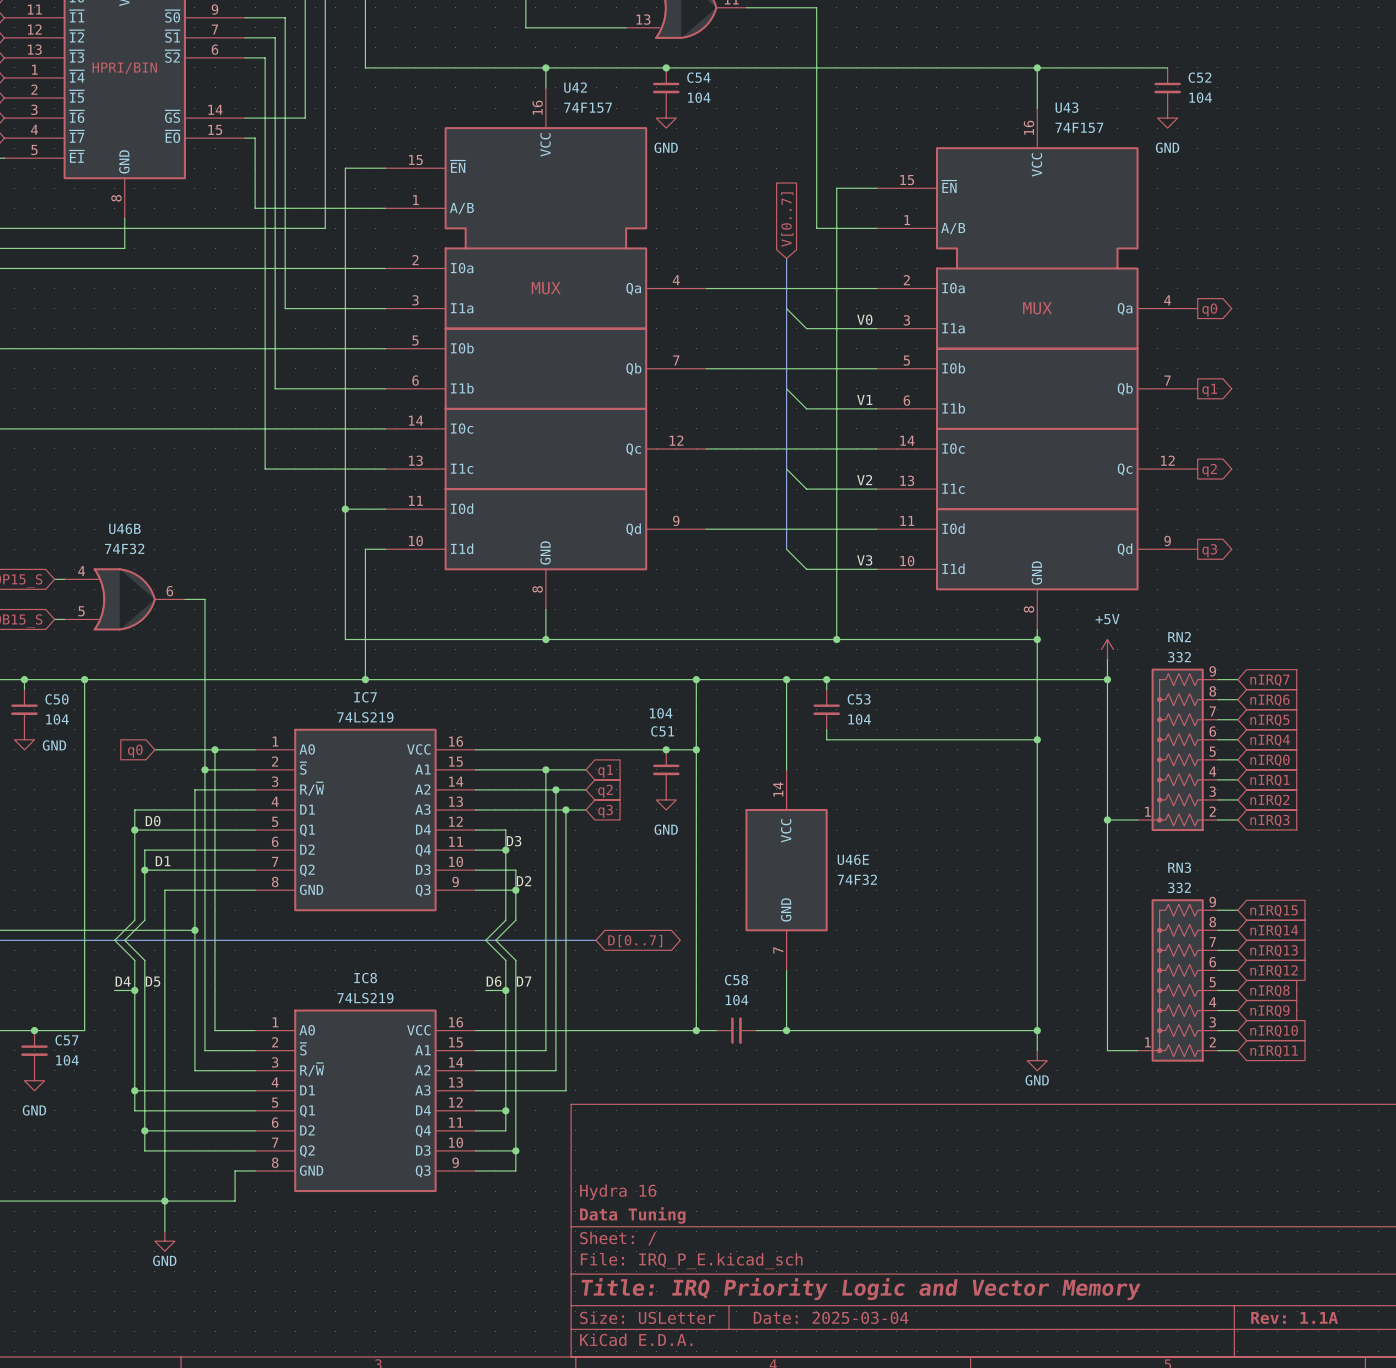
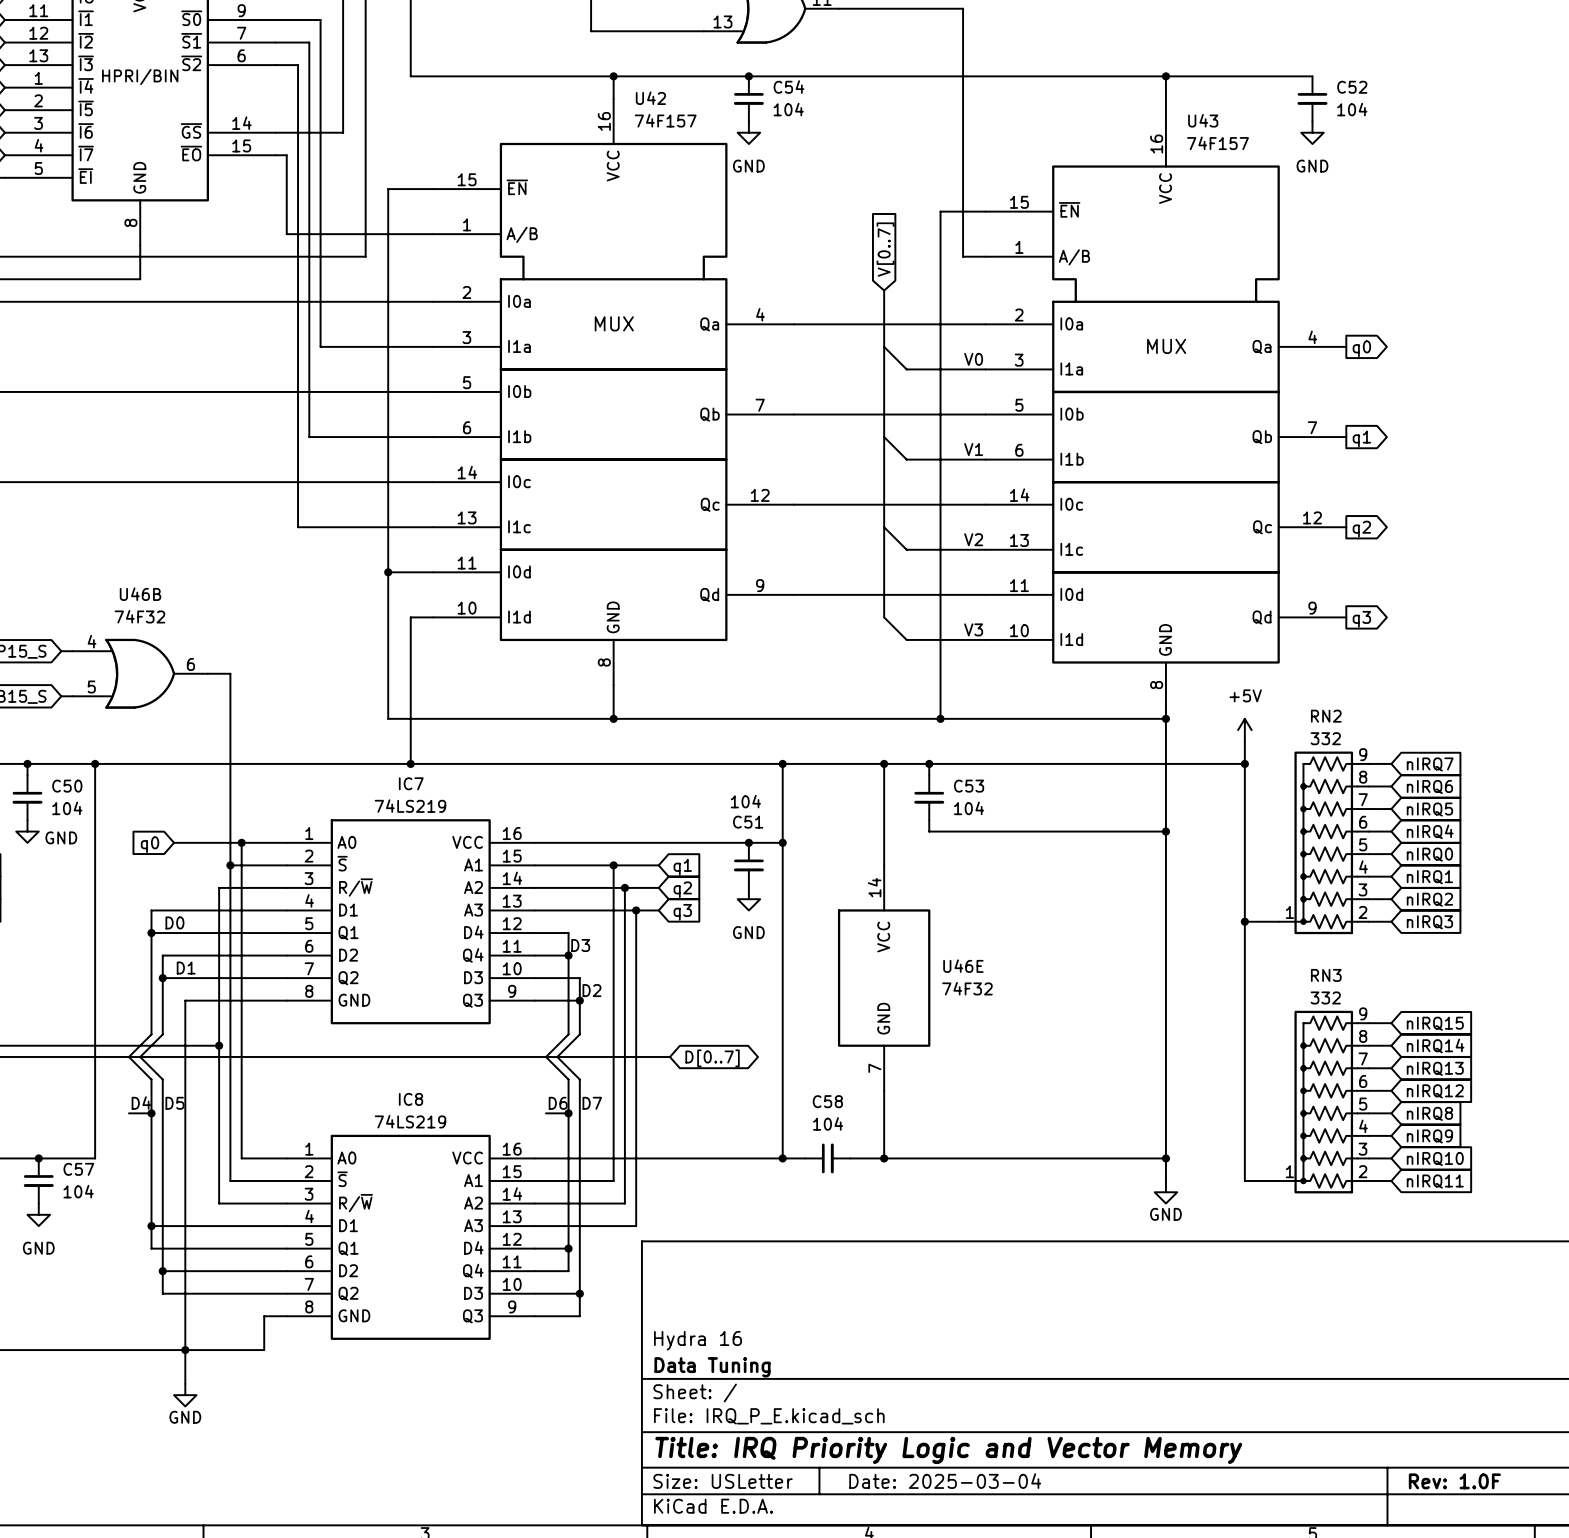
wire: (816, 7) (816, 228) (856, 228) -> (917, 8) (963, 8) (963, 256)
title block: Rev: 1.1A (1294, 1317) -> Rev: 1.0F (1454, 1481)

